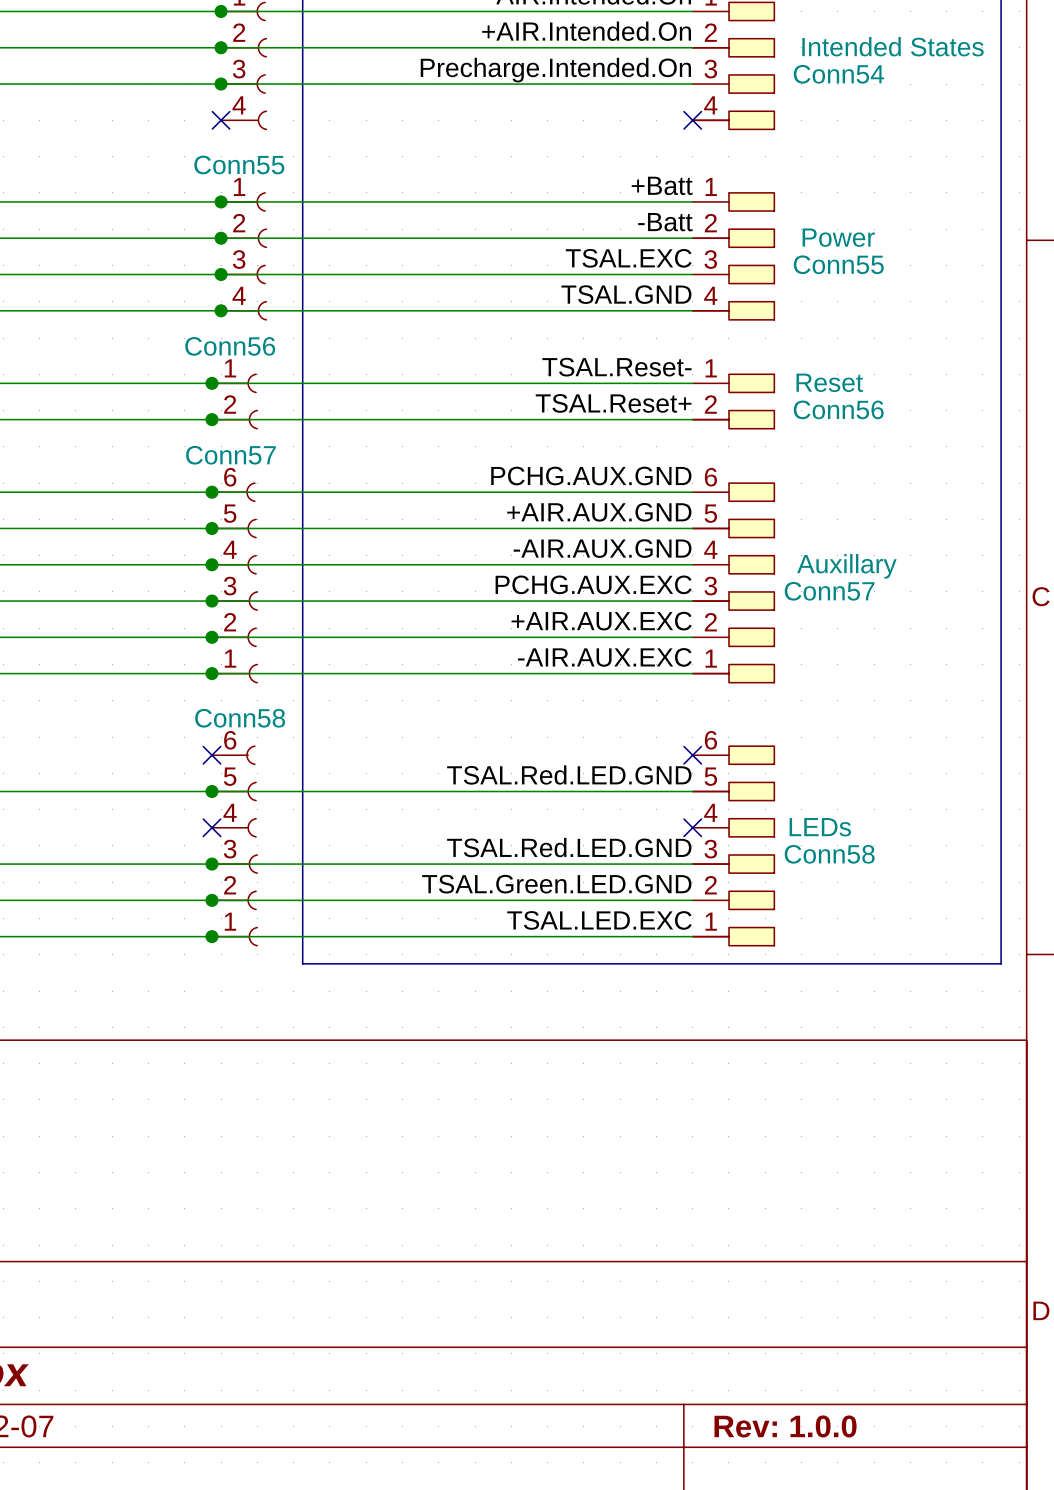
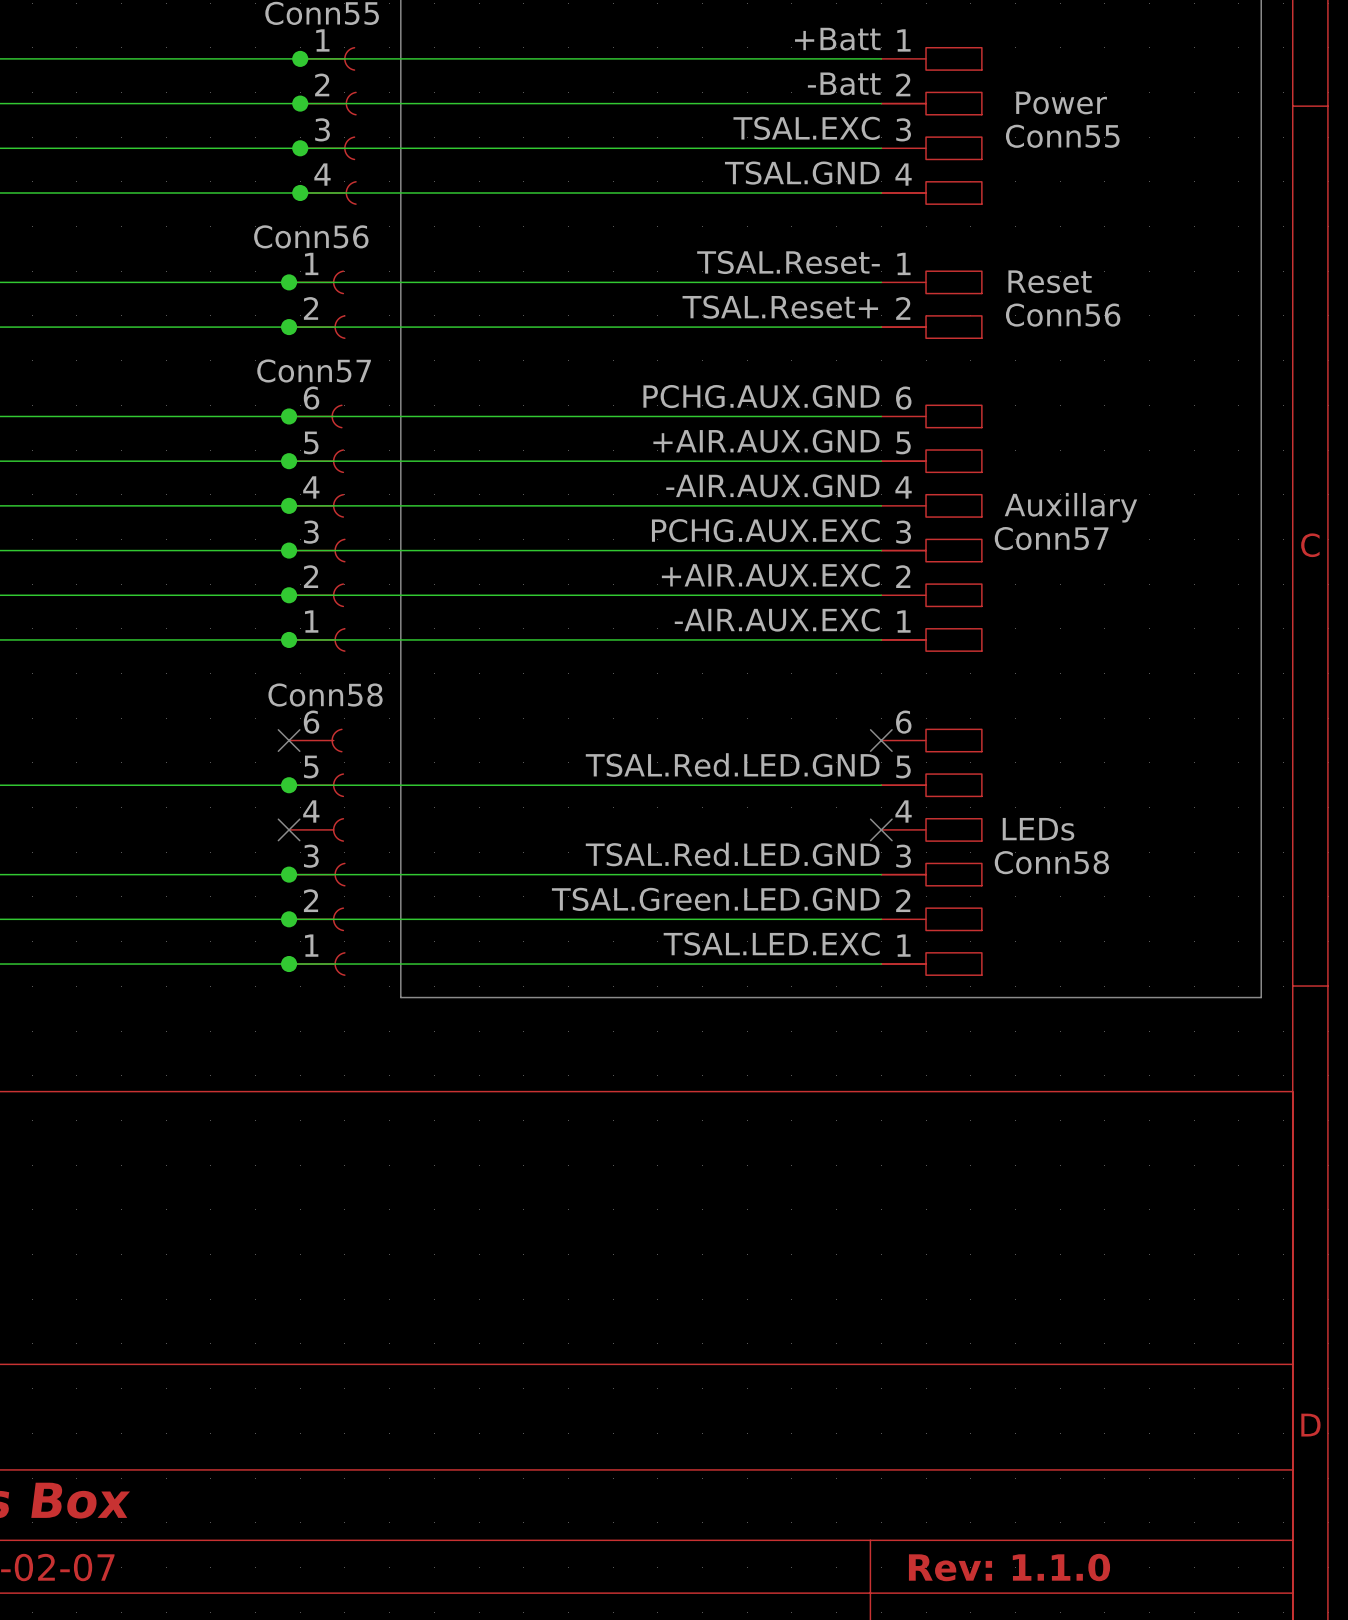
title block: Rev: 1.0.0 (785, 1426) -> Rev: 1.1.0 (1009, 1567)

